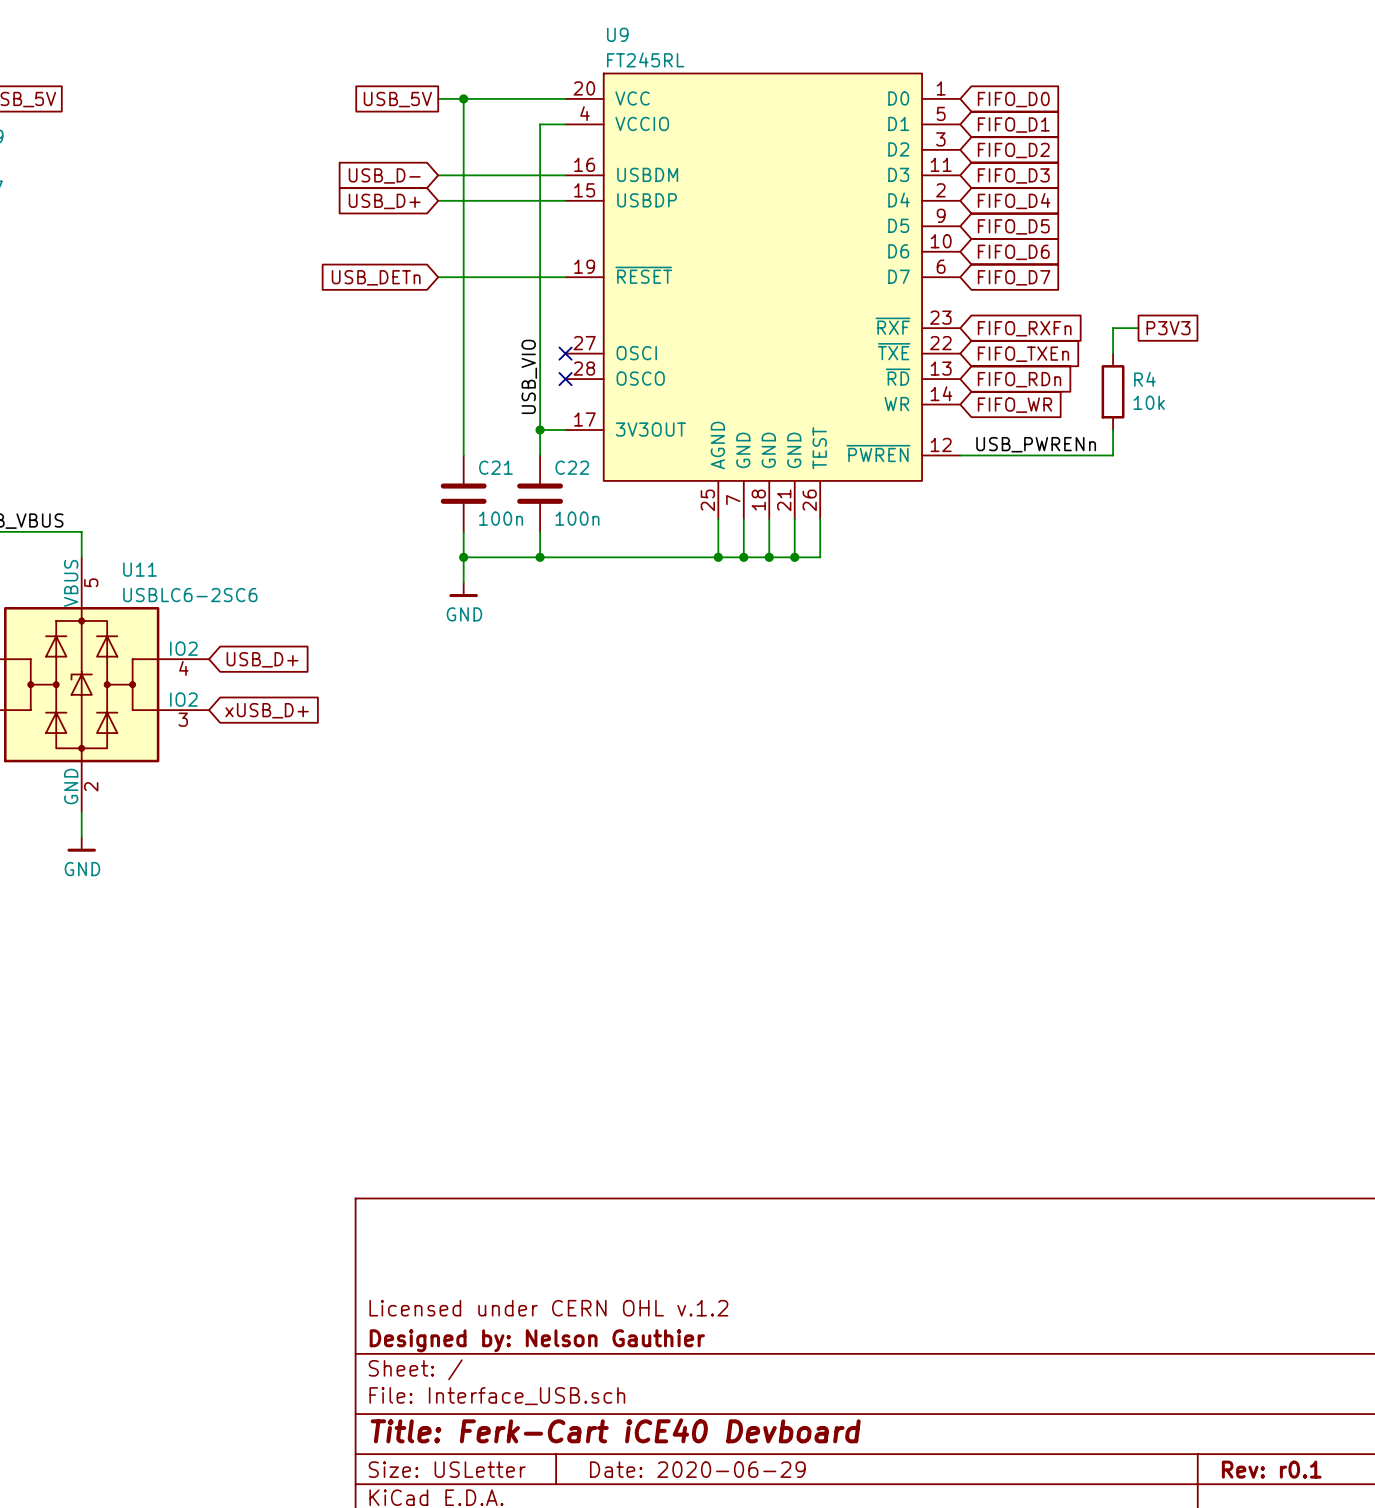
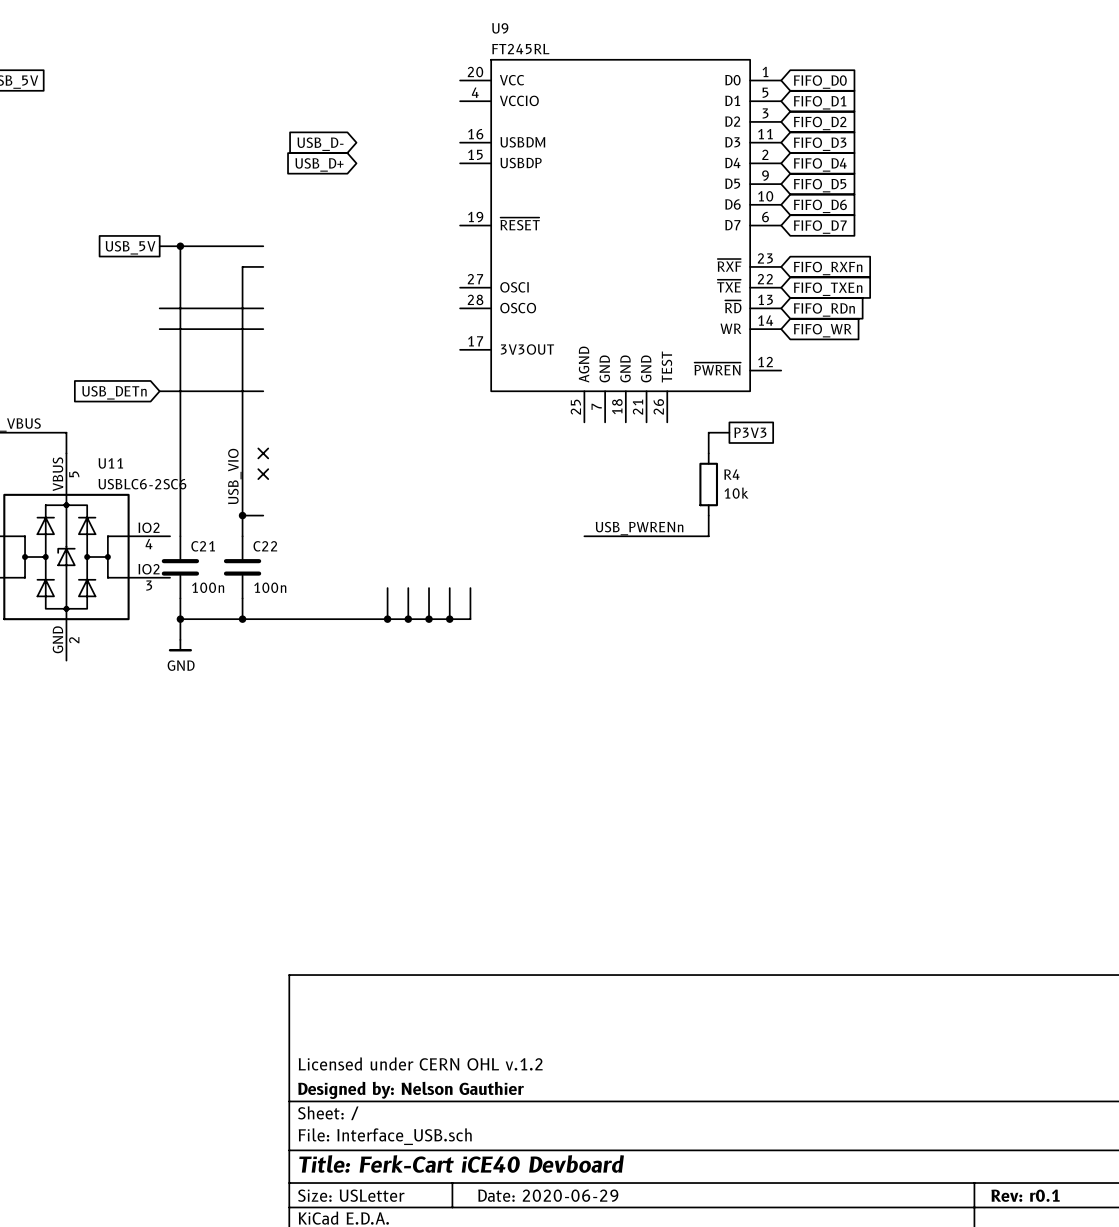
wire: (438, 98) (565, 98) -> none
wire: (463, 98) (463, 455) -> none
junction: (463, 98) -> none
global label: USB_5V (397, 99) -> none
wire: (565, 124) (540, 124) (540, 455) -> none
wire: (438, 175) (565, 175) -> none
wire: (438, 200) (565, 200) -> none
global label: USB_DETn (376, 277) -> none
wire: (438, 277) (565, 277) -> (159, 246) (263, 246)
wire: none -> (180, 246) (180, 536)
junction: none -> (180, 246)
global label: none -> USB_5V (130, 247)
wire: none -> (263, 266) (242, 266) (242, 536)
wire: (1138, 328) (1113, 328) (1113, 353) -> none
global label: P3V3 (1168, 328) -> none
no-connect mark: (565, 353) -> none
label: USB_VIO (529, 376) -> none
wire: none -> (159, 308) (263, 308)
no-connect mark: (565, 379) -> none
R4 position: (1113, 391) -> (708, 484)
wire: none -> (159, 329) (263, 329)
wire: (540, 430) (565, 430) -> none
junction: (540, 430) -> none
wire: (1113, 430) (1113, 455) (960, 455) -> none
label: USB_PWRENn (1036, 444) -> none
wire: none -> (159, 391) (263, 391)
global label: none -> USB_DETn (114, 392)
C21 position: (463, 493) -> (180, 567)
C22 position: (540, 493) -> (242, 567)
wire: (718, 519) (718, 557) -> none
wire: (743, 519) (743, 557) -> none
wire: (769, 519) (769, 557) -> none
wire: (794, 519) (794, 557) -> none
wire: (820, 519) (820, 557) (463, 557) -> none
wire: (463, 531) (463, 582) -> none
wire: (540, 531) (540, 557) -> none
wire: none -> (729, 432) (708, 432) (708, 453)
global label: none -> P3V3 (750, 432)
no-connect mark: none -> (263, 453)
junction: (463, 557) -> none
junction: (540, 557) -> none
junction: (718, 557) -> none
junction: (743, 557) -> none
junction: (769, 557) -> none
junction: (794, 557) -> none
label: none -> USB_VIO (234, 476)
no-connect mark: none -> (263, 474)
power symbol: GND (463, 589) -> none
wire: none -> (242, 515) (263, 515)
junction: none -> (242, 515)
wire: none -> (708, 515) (708, 536) (584, 536)
label: none -> USB_PWRENn (639, 528)
global label: USB_D+ (262, 659) -> none
global label: xUSB_D+ (267, 710) -> none
wire: none -> (387, 588) (387, 619)
wire: none -> (408, 588) (408, 619)
wire: none -> (429, 588) (429, 619)
wire: none -> (449, 588) (449, 619)
wire: none -> (470, 588) (470, 619) (180, 619)
wire: none -> (180, 598) (180, 639)
junction: none -> (180, 619)
junction: none -> (242, 619)
junction: none -> (387, 619)
junction: none -> (408, 619)
junction: none -> (429, 619)
junction: none -> (449, 619)
wire: (81, 811) (81, 837) -> (242, 598) (242, 619)
power symbol position: GND (81, 844) -> GND (180, 645)

